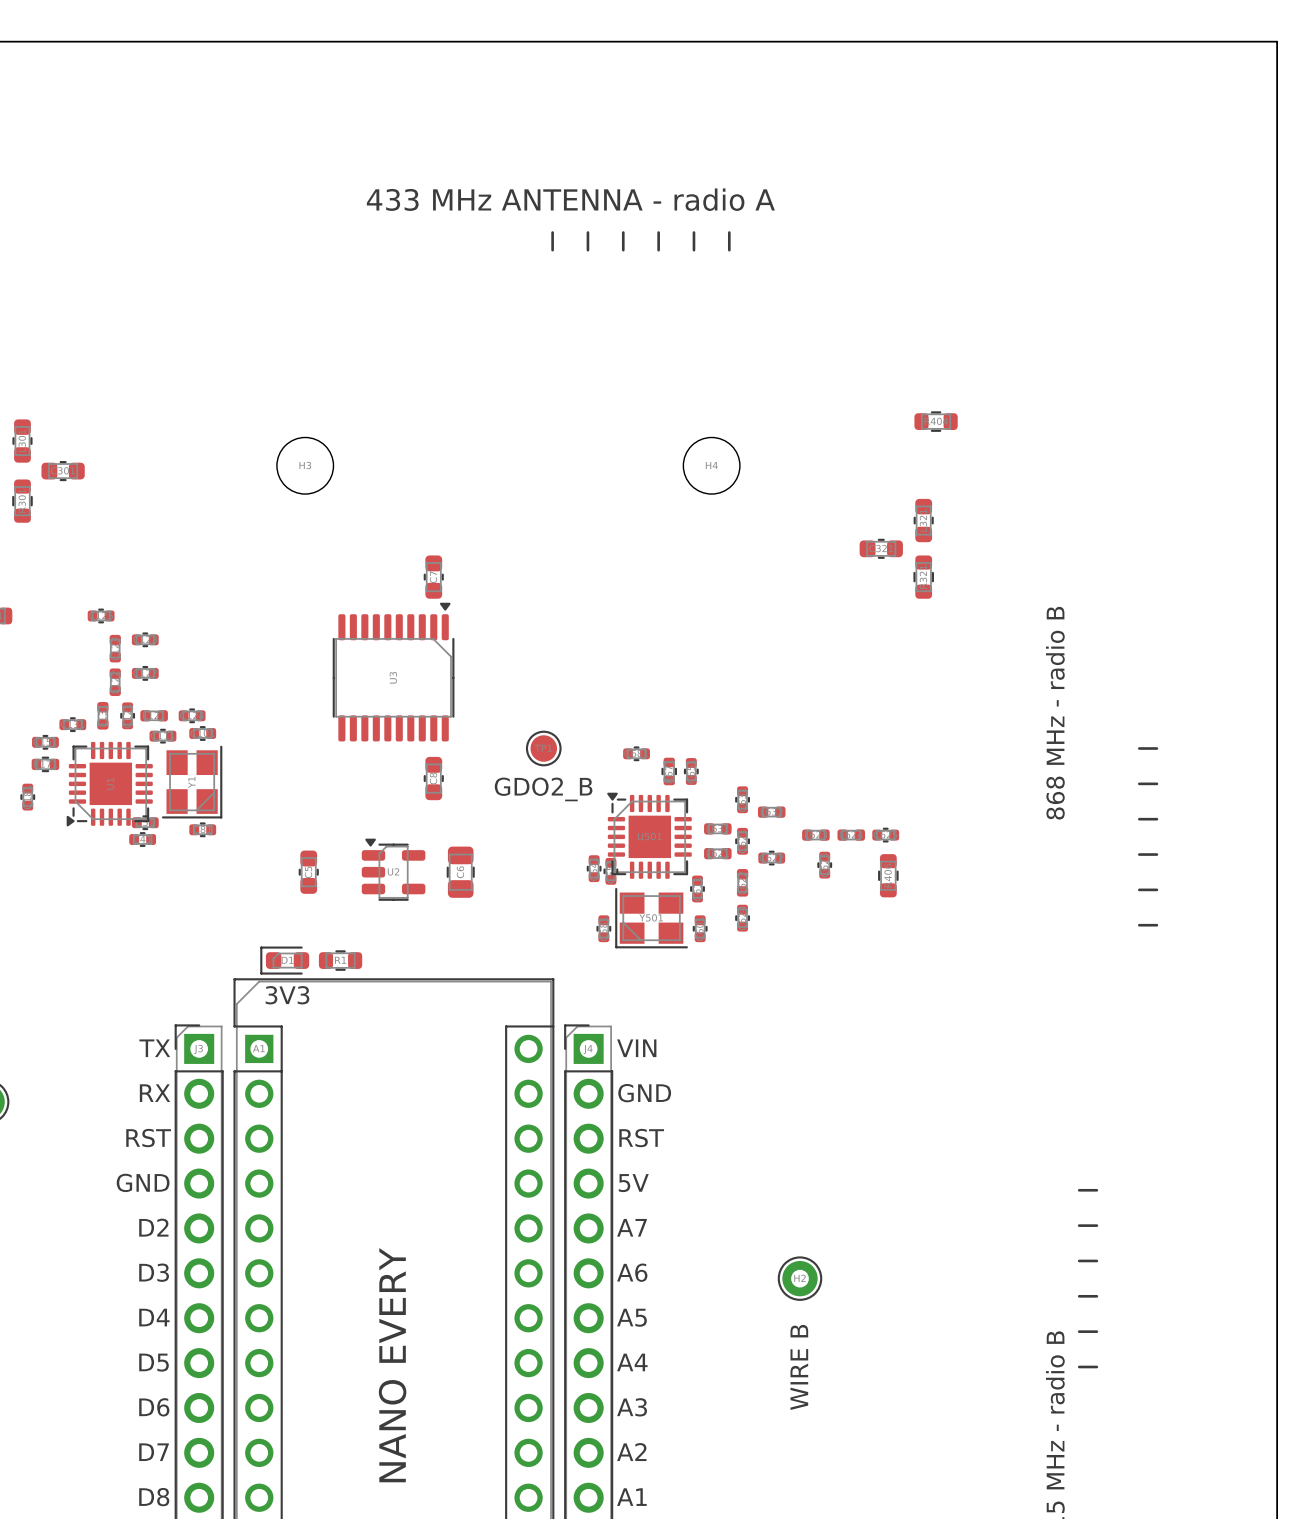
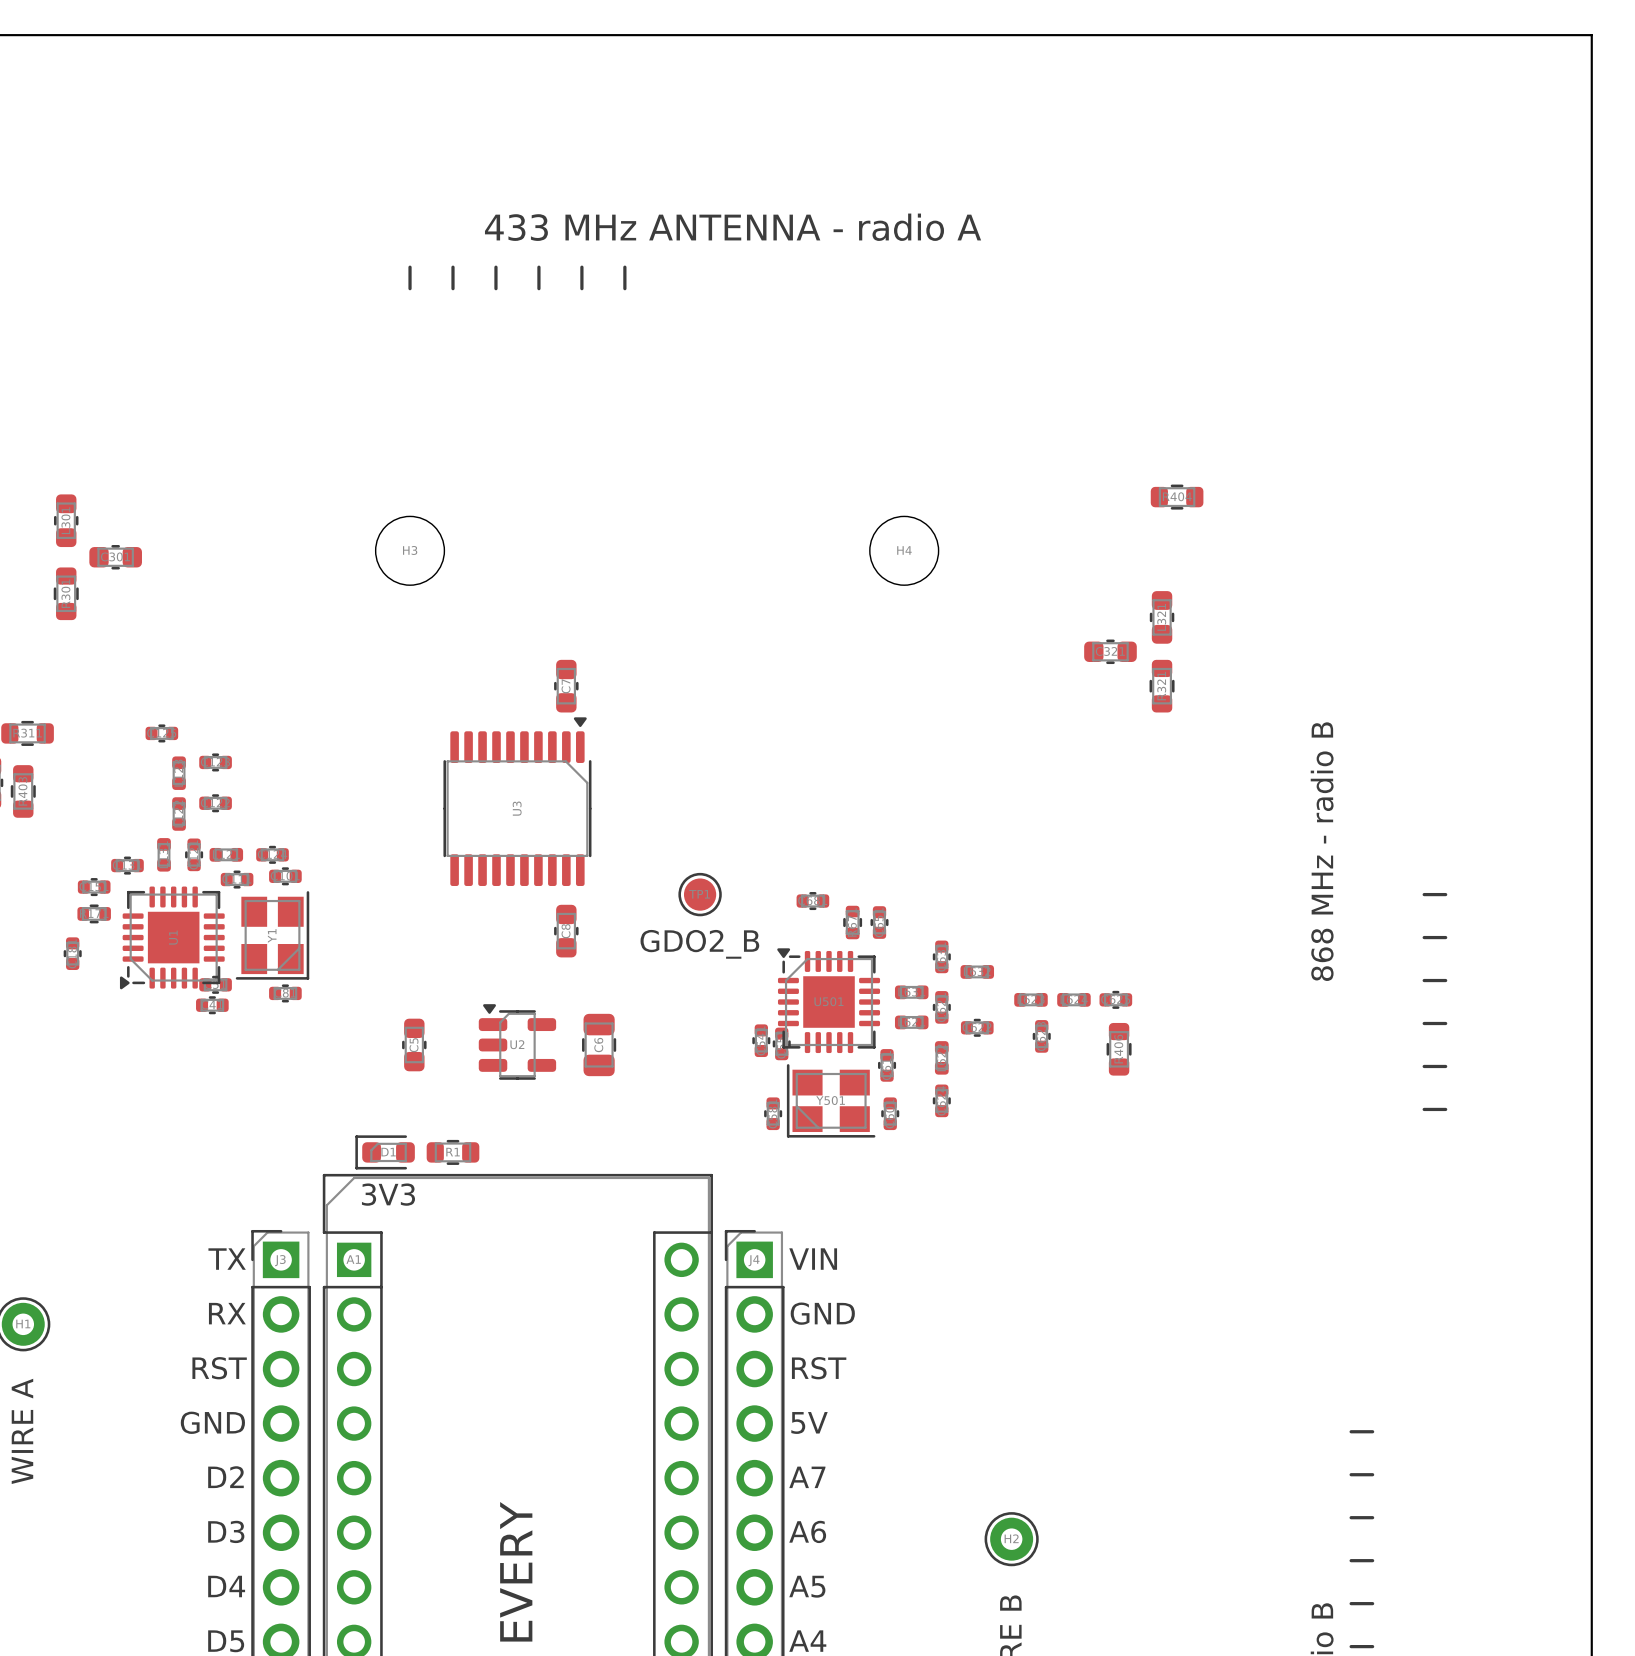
line: (552, 232) (552, 250) -> (624, 267) (624, 288)
line: (587, 232) (587, 250) -> (581, 267) (581, 288)
line: (623, 232) (623, 250) -> (538, 267) (538, 288)
line: (658, 232) (658, 250) -> (495, 267) (495, 288)
line: (693, 232) (693, 250) -> (452, 267) (452, 288)
line: (729, 232) (729, 250) -> (410, 267) (410, 288)

